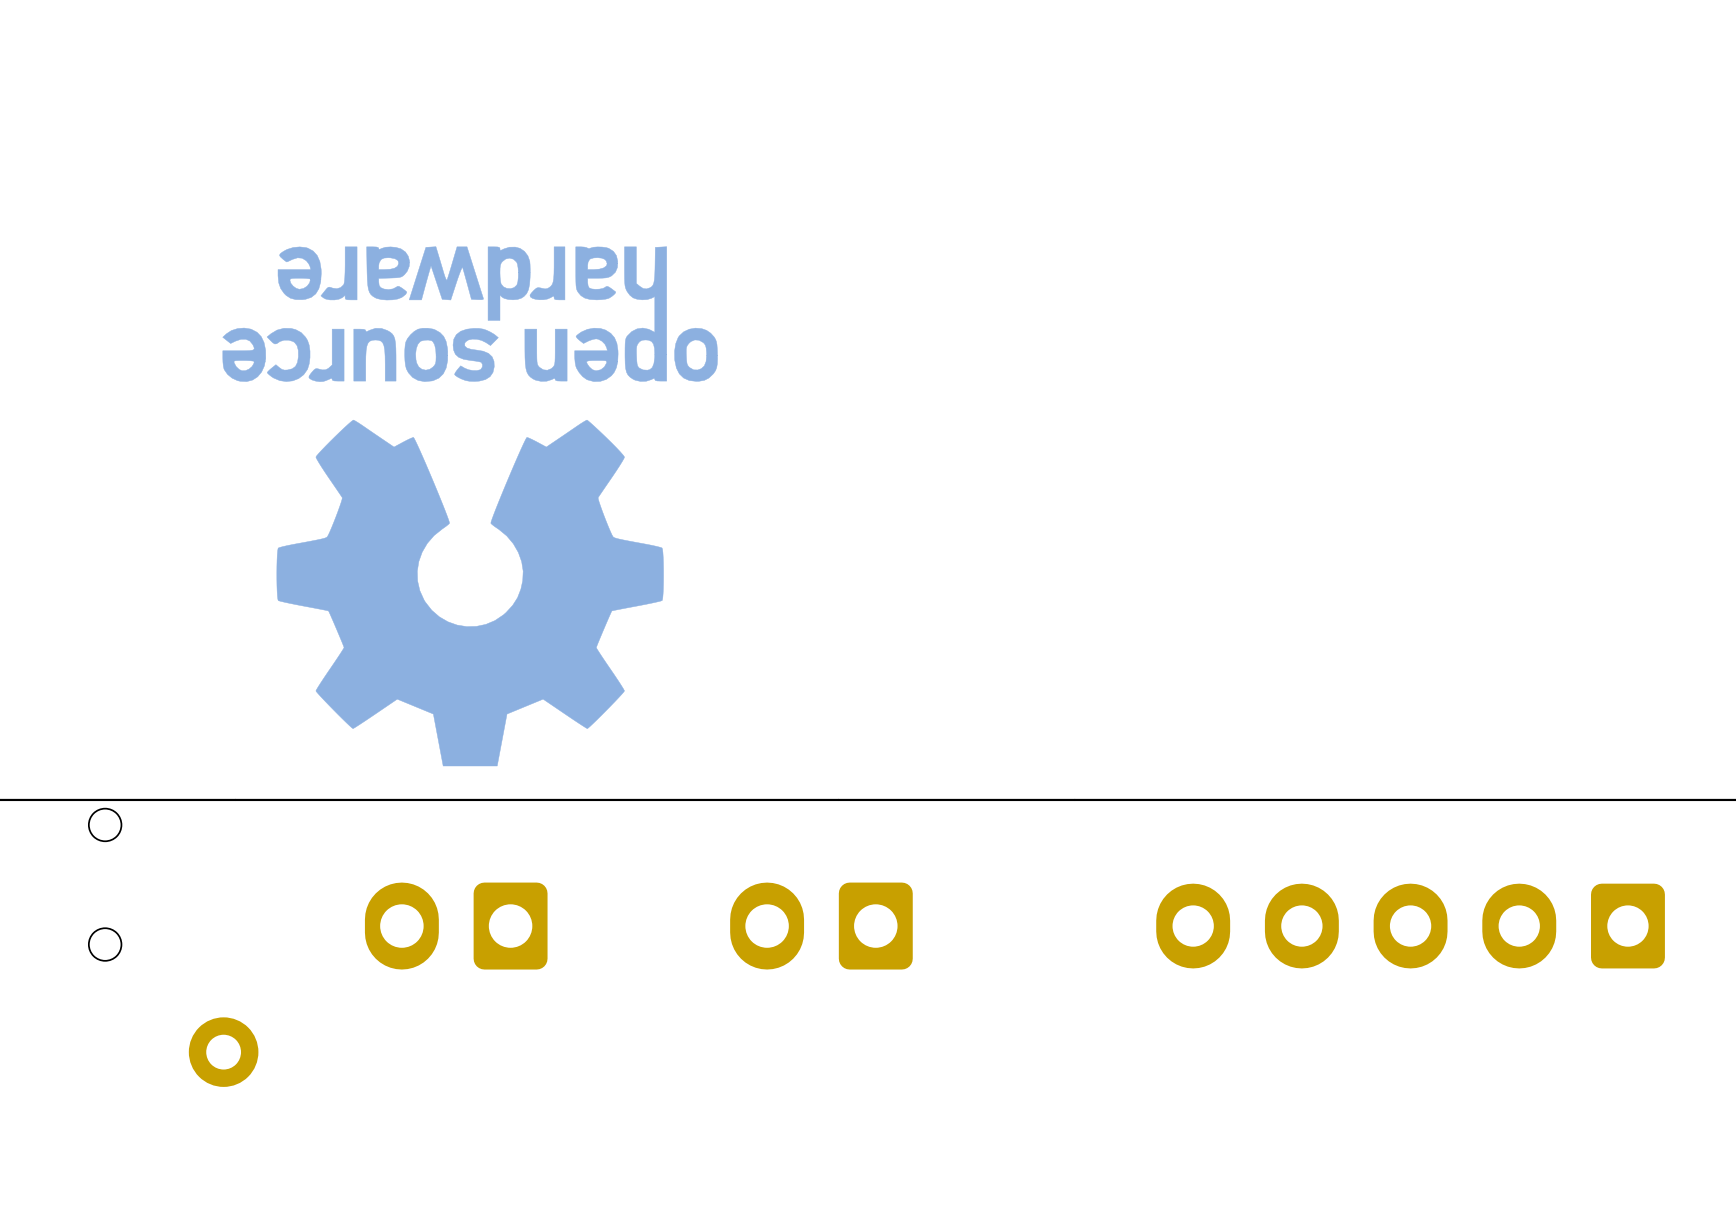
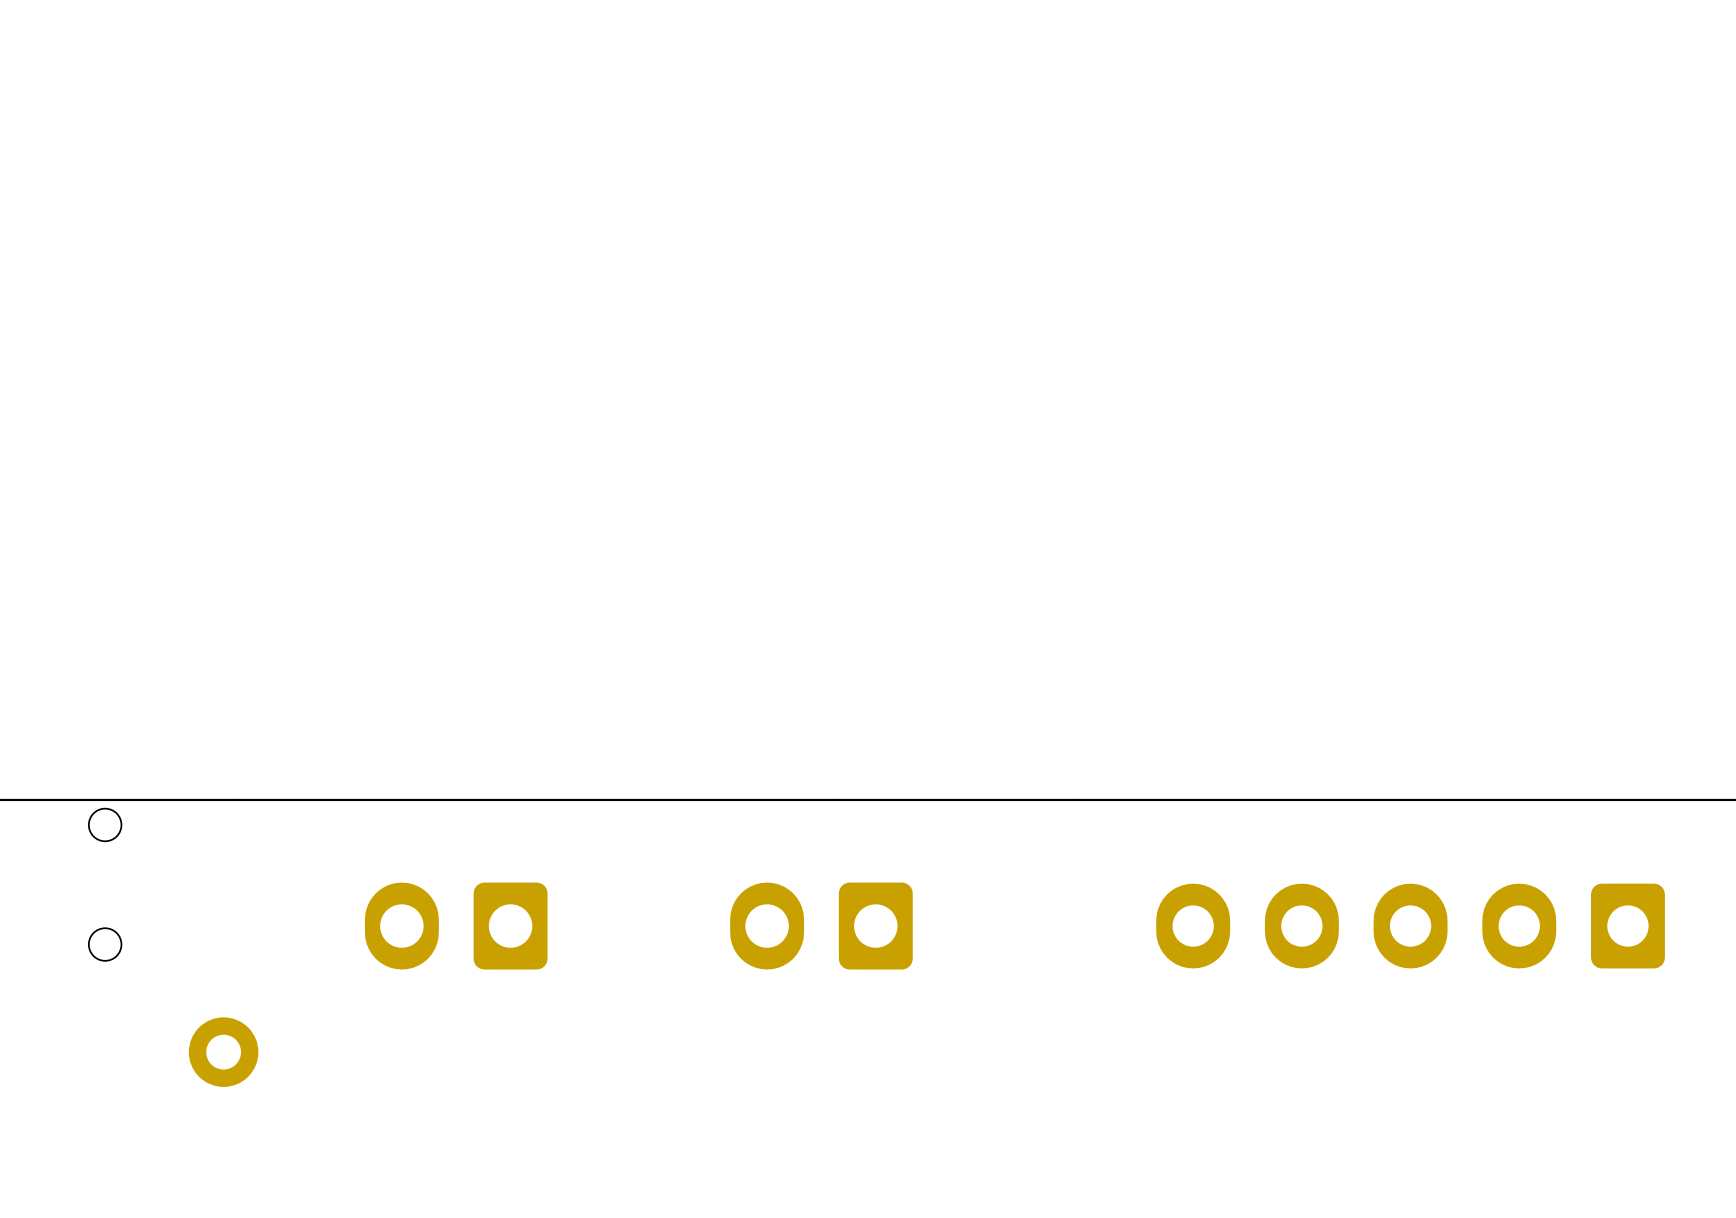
part: (470, 506) -> none

